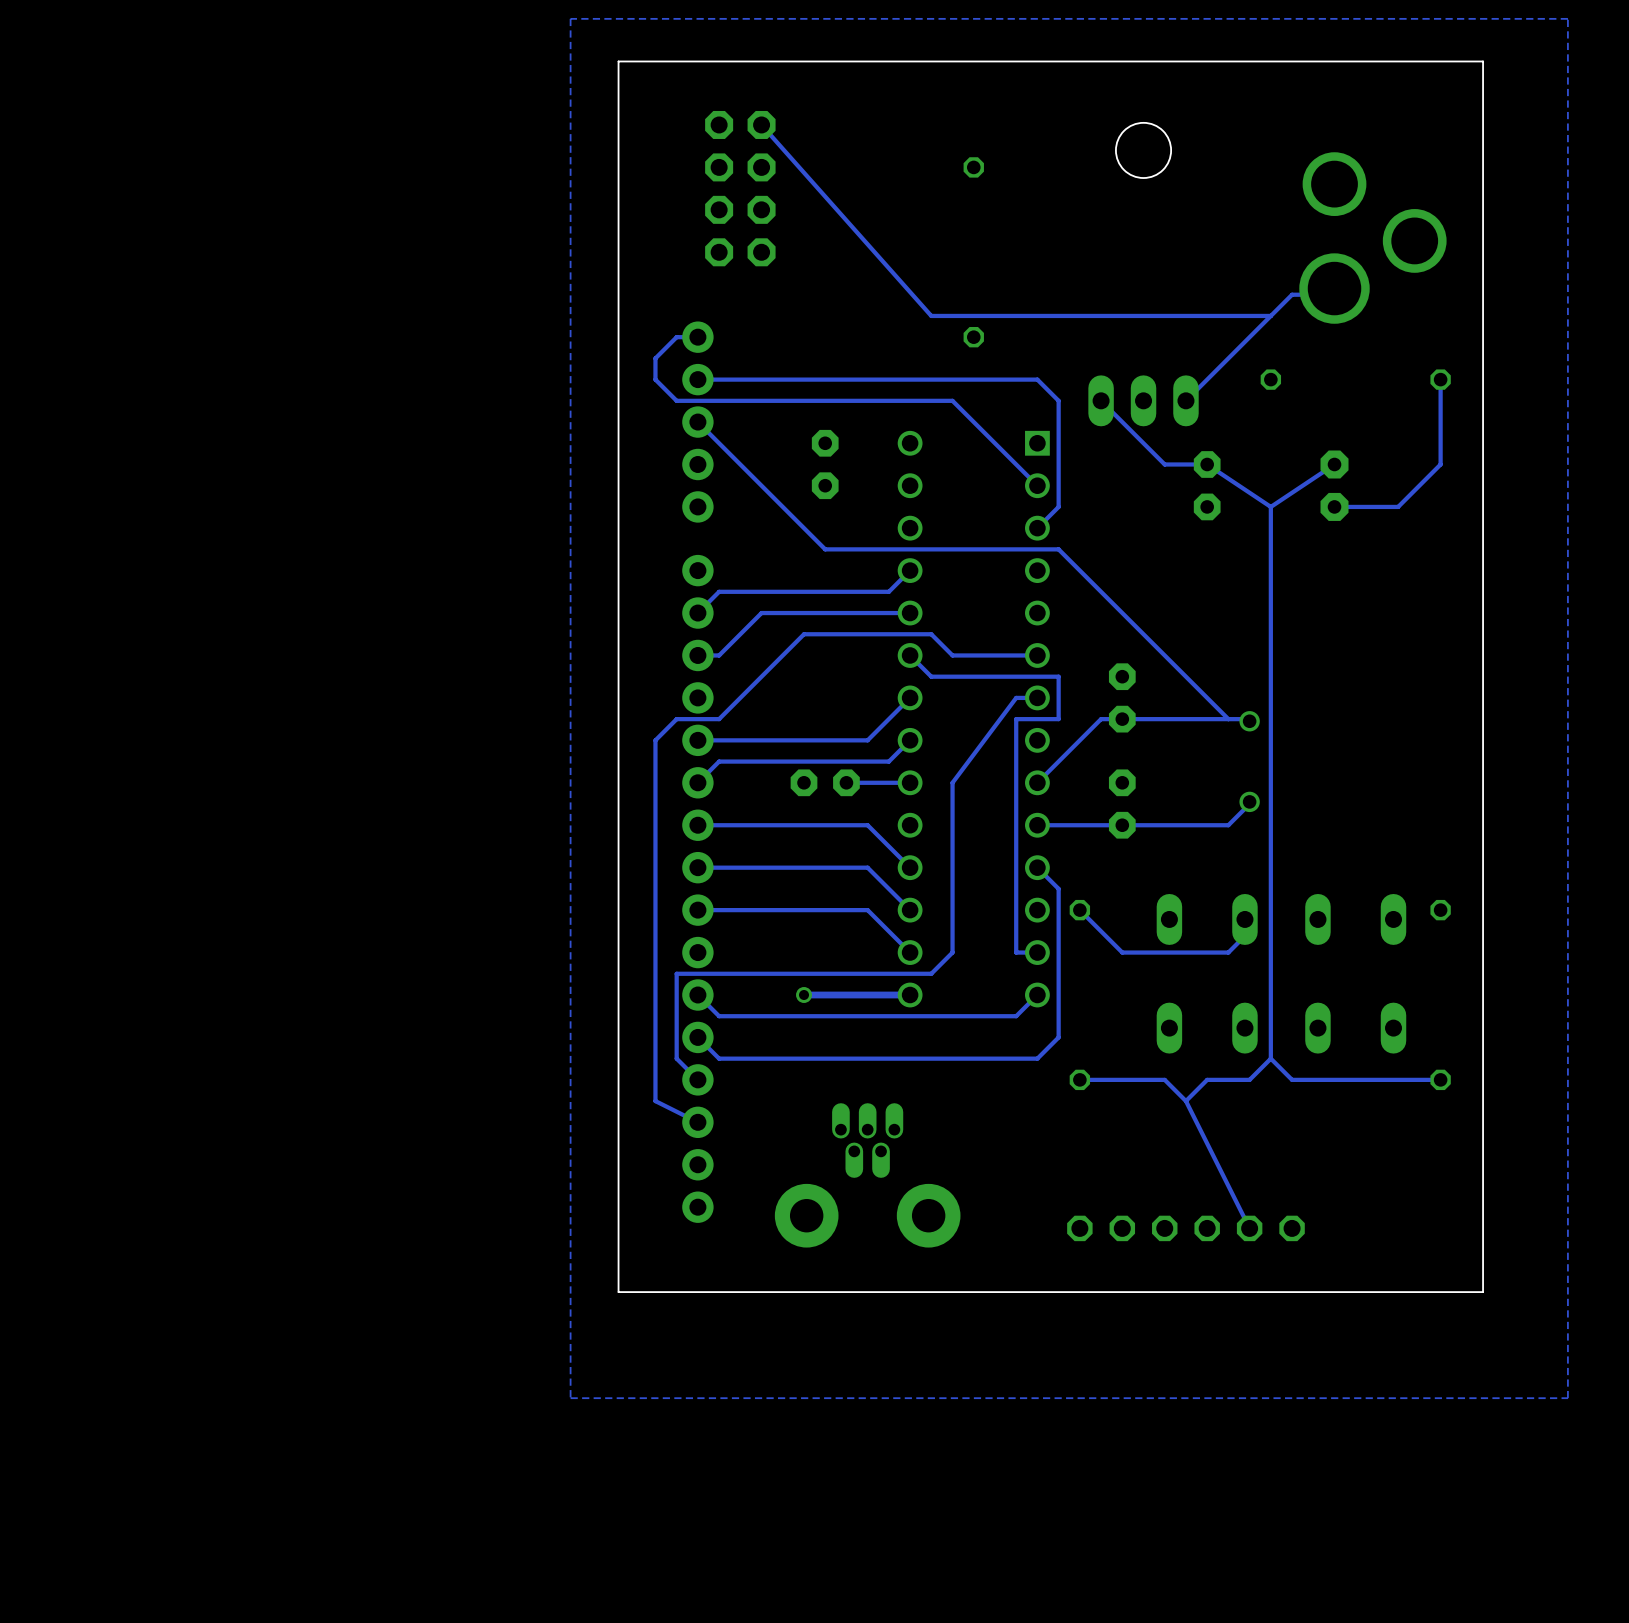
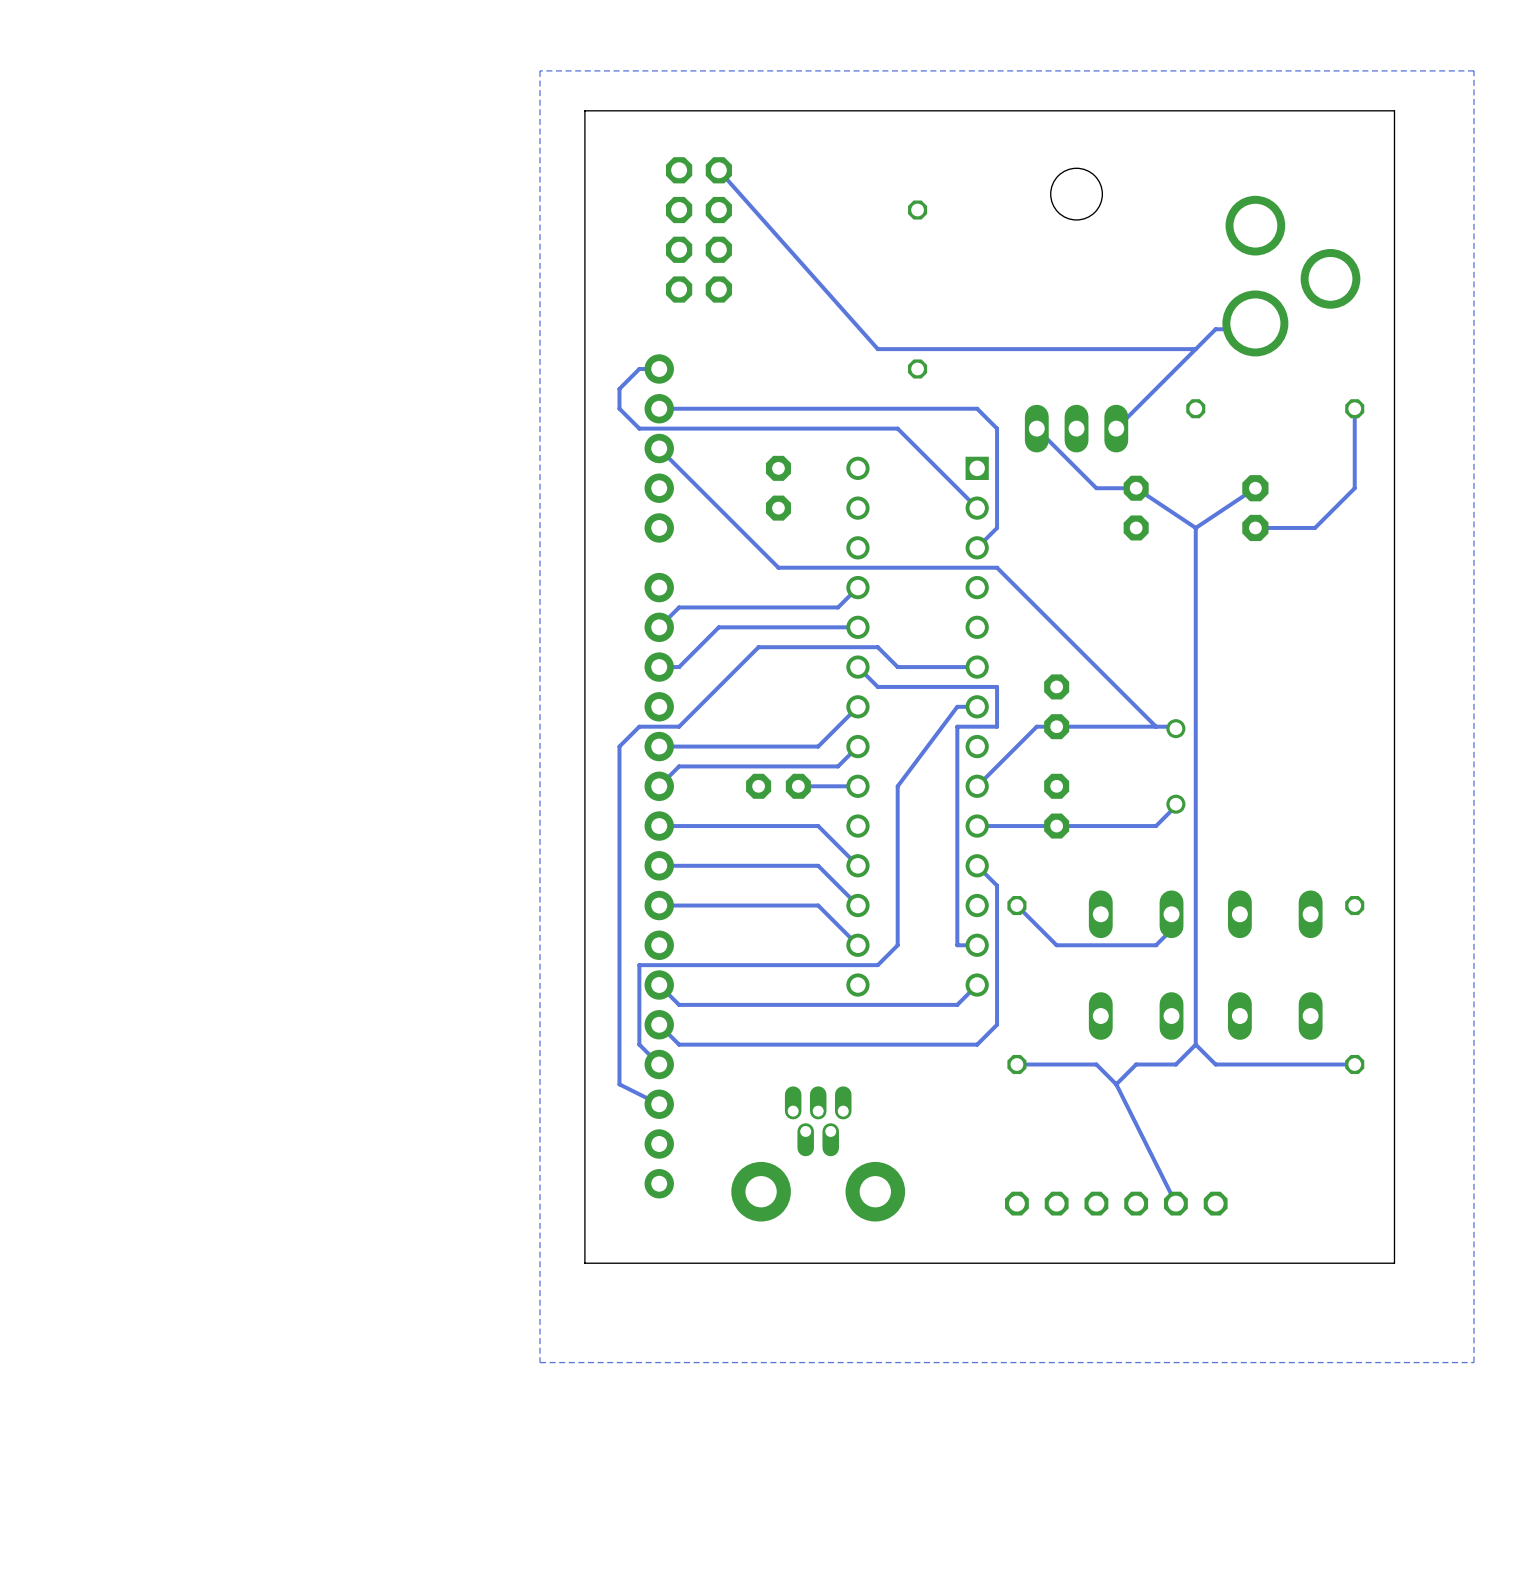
via: (804, 995) -> none
track: (910, 995) (804, 995) -> none

